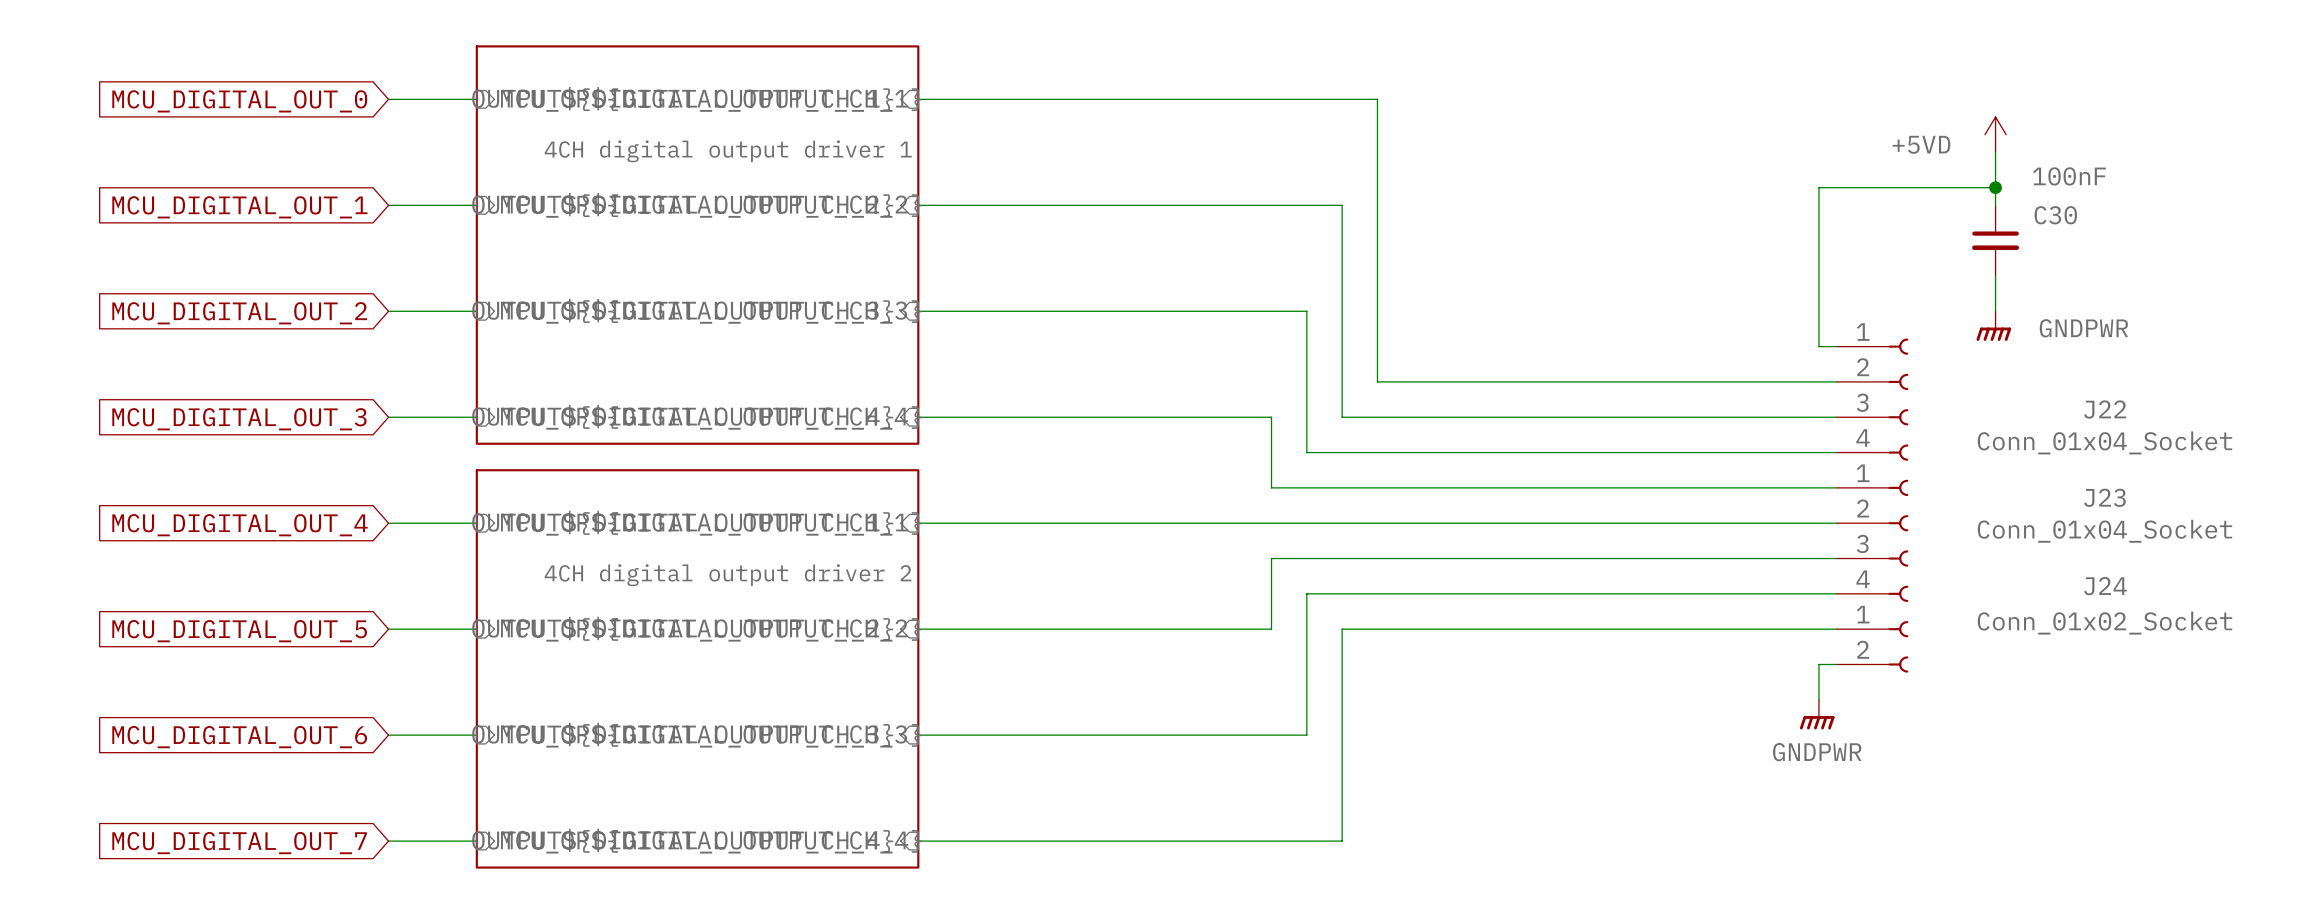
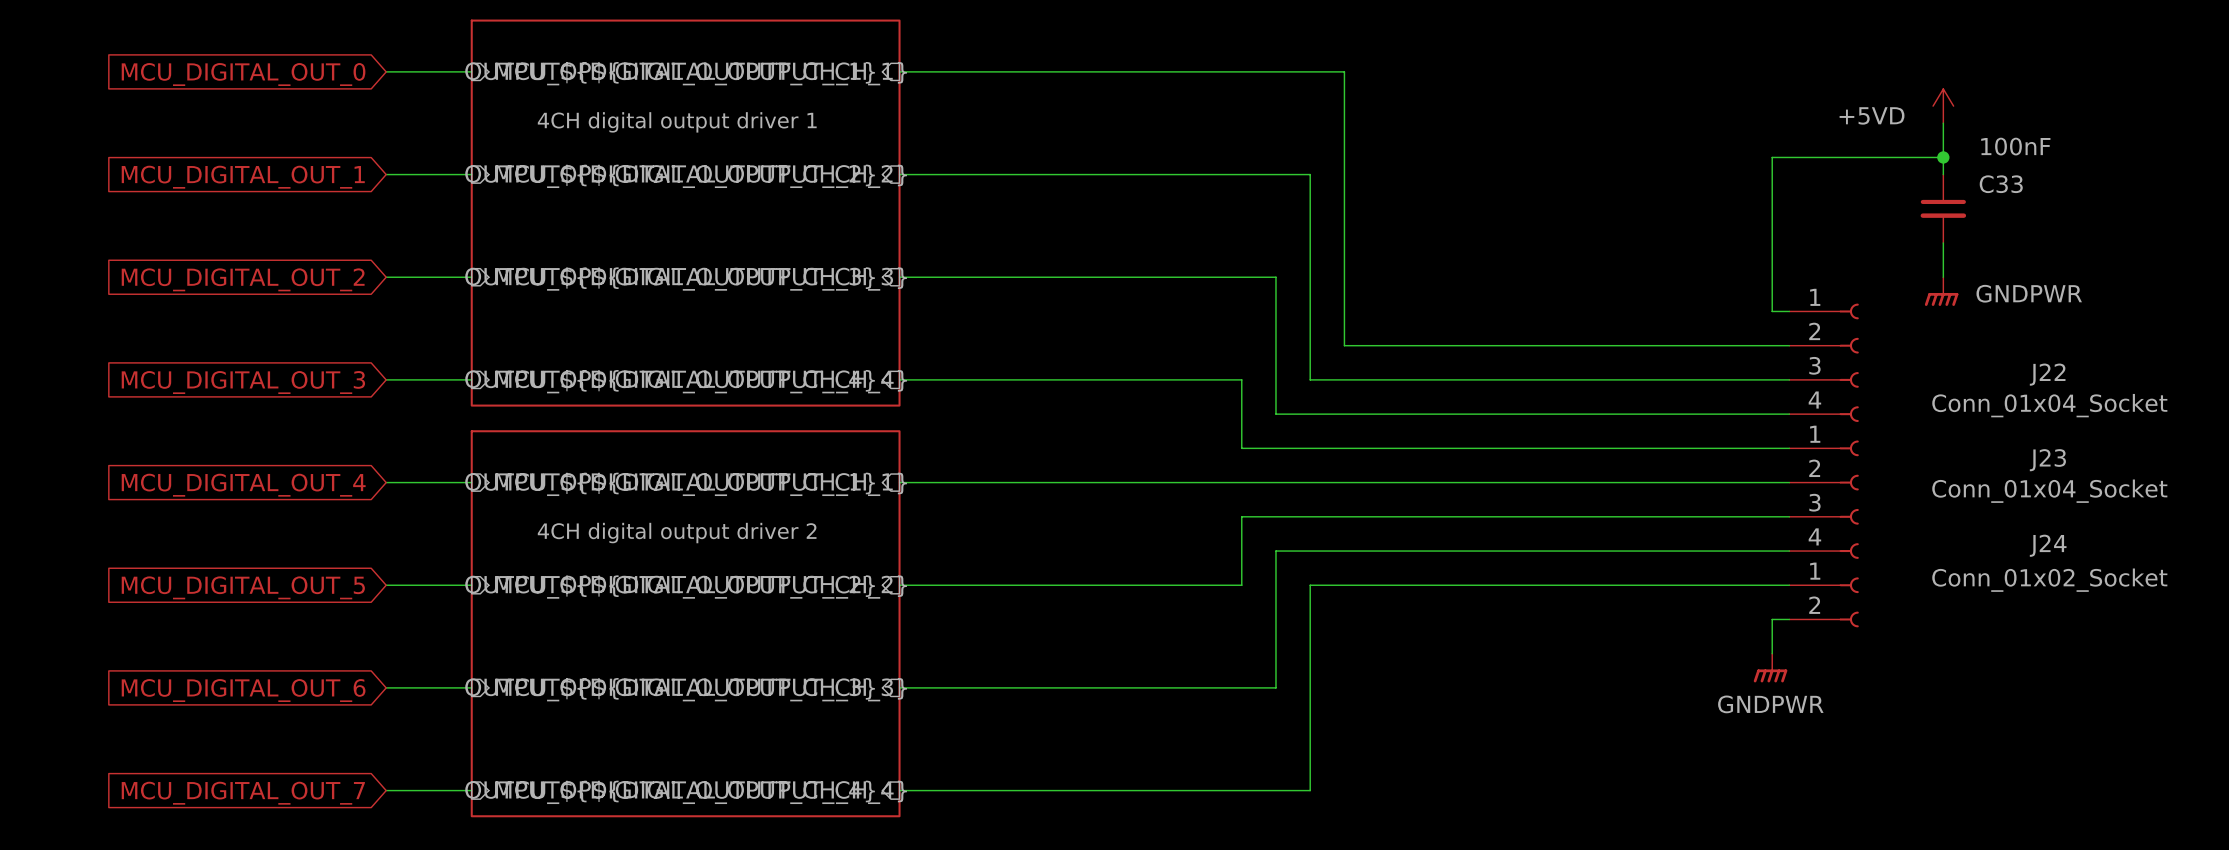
C30 name: C30 (2055, 215) -> C33 (2001, 184)

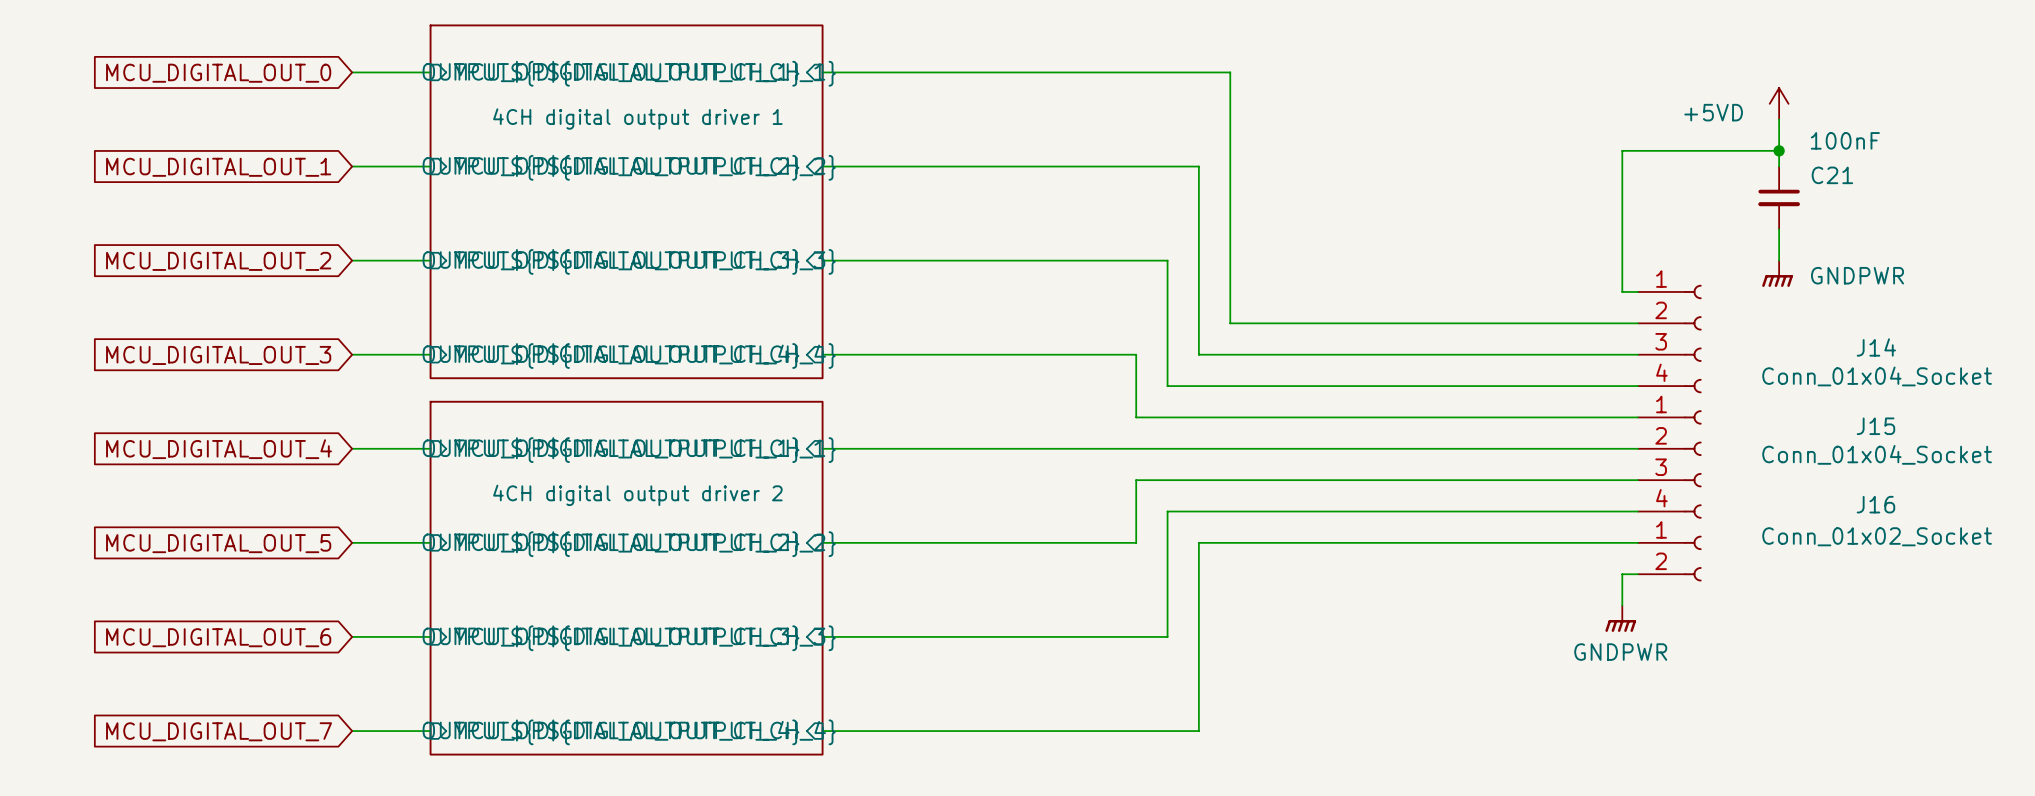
C33 name: C33 (2001, 184) -> C21 (1832, 175)
J22 name: J22 (2047, 374) -> J14 (1876, 347)
J23 name: J23 (2047, 460) -> J15 (1875, 426)
J24 name: J24 (2048, 545) -> J16 (1875, 504)

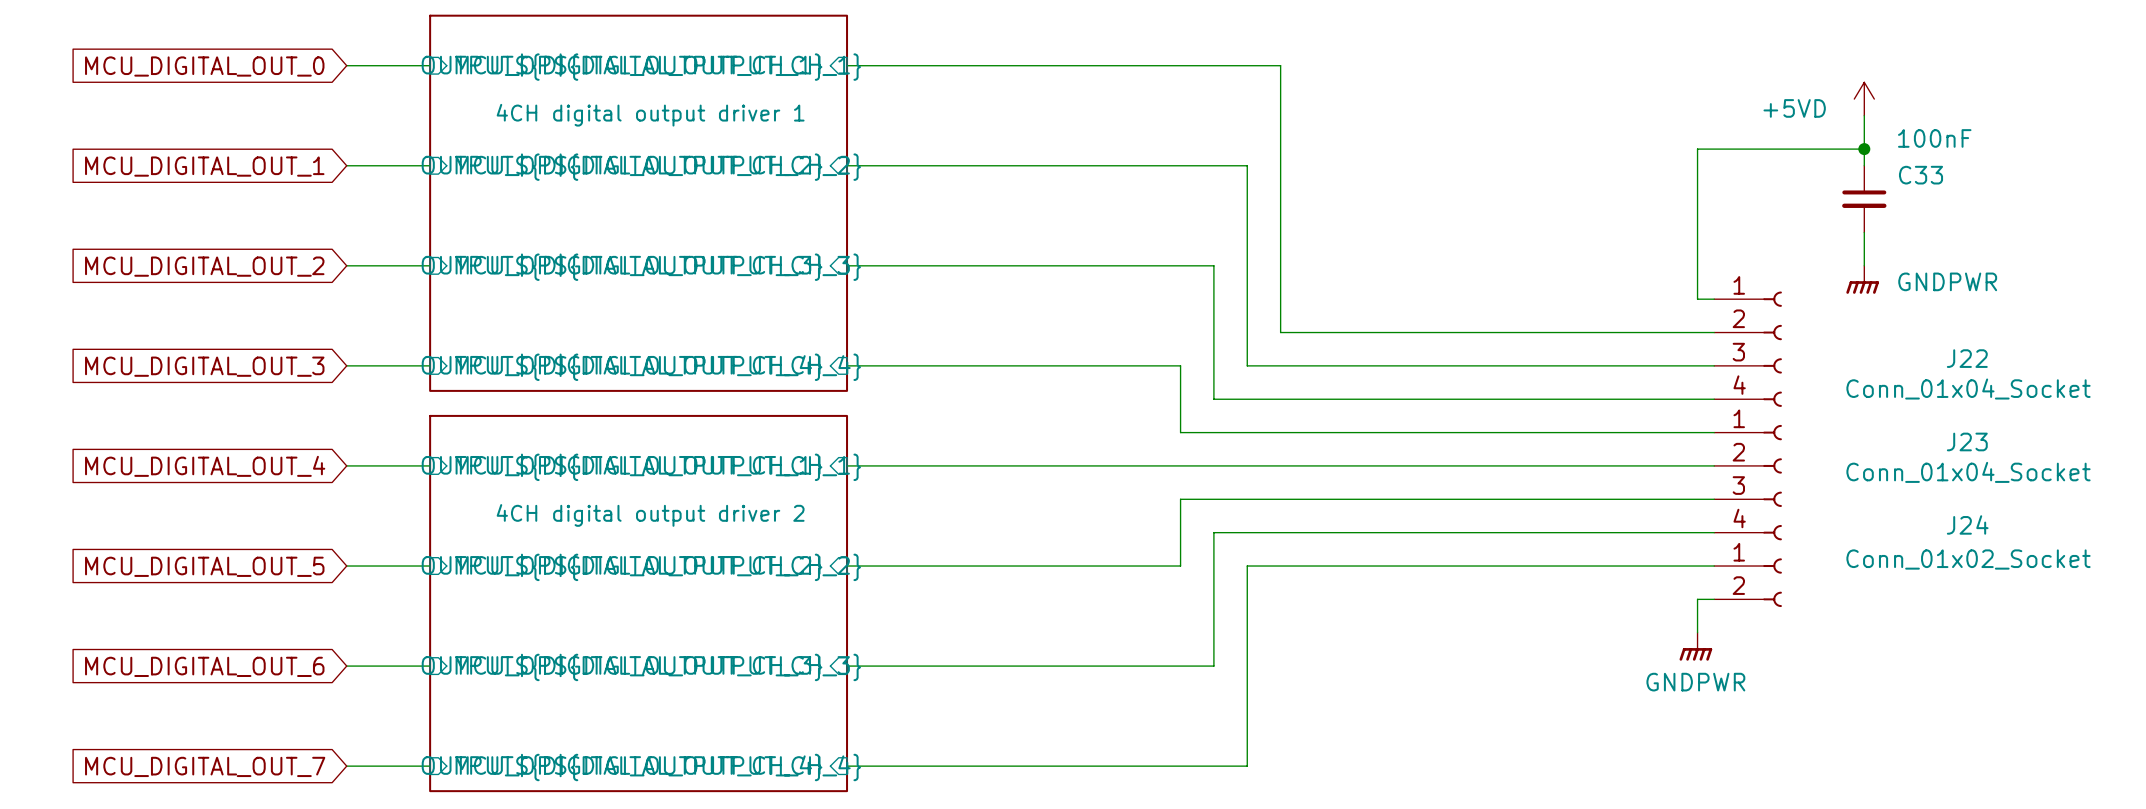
C21 name: C21 (1832, 175) -> C33 (1921, 175)
J14 name: J14 (1876, 347) -> J22 (1967, 358)
J15 name: J15 (1875, 426) -> J23 (1967, 441)
J16 name: J16 (1875, 504) -> J24 (1967, 524)

